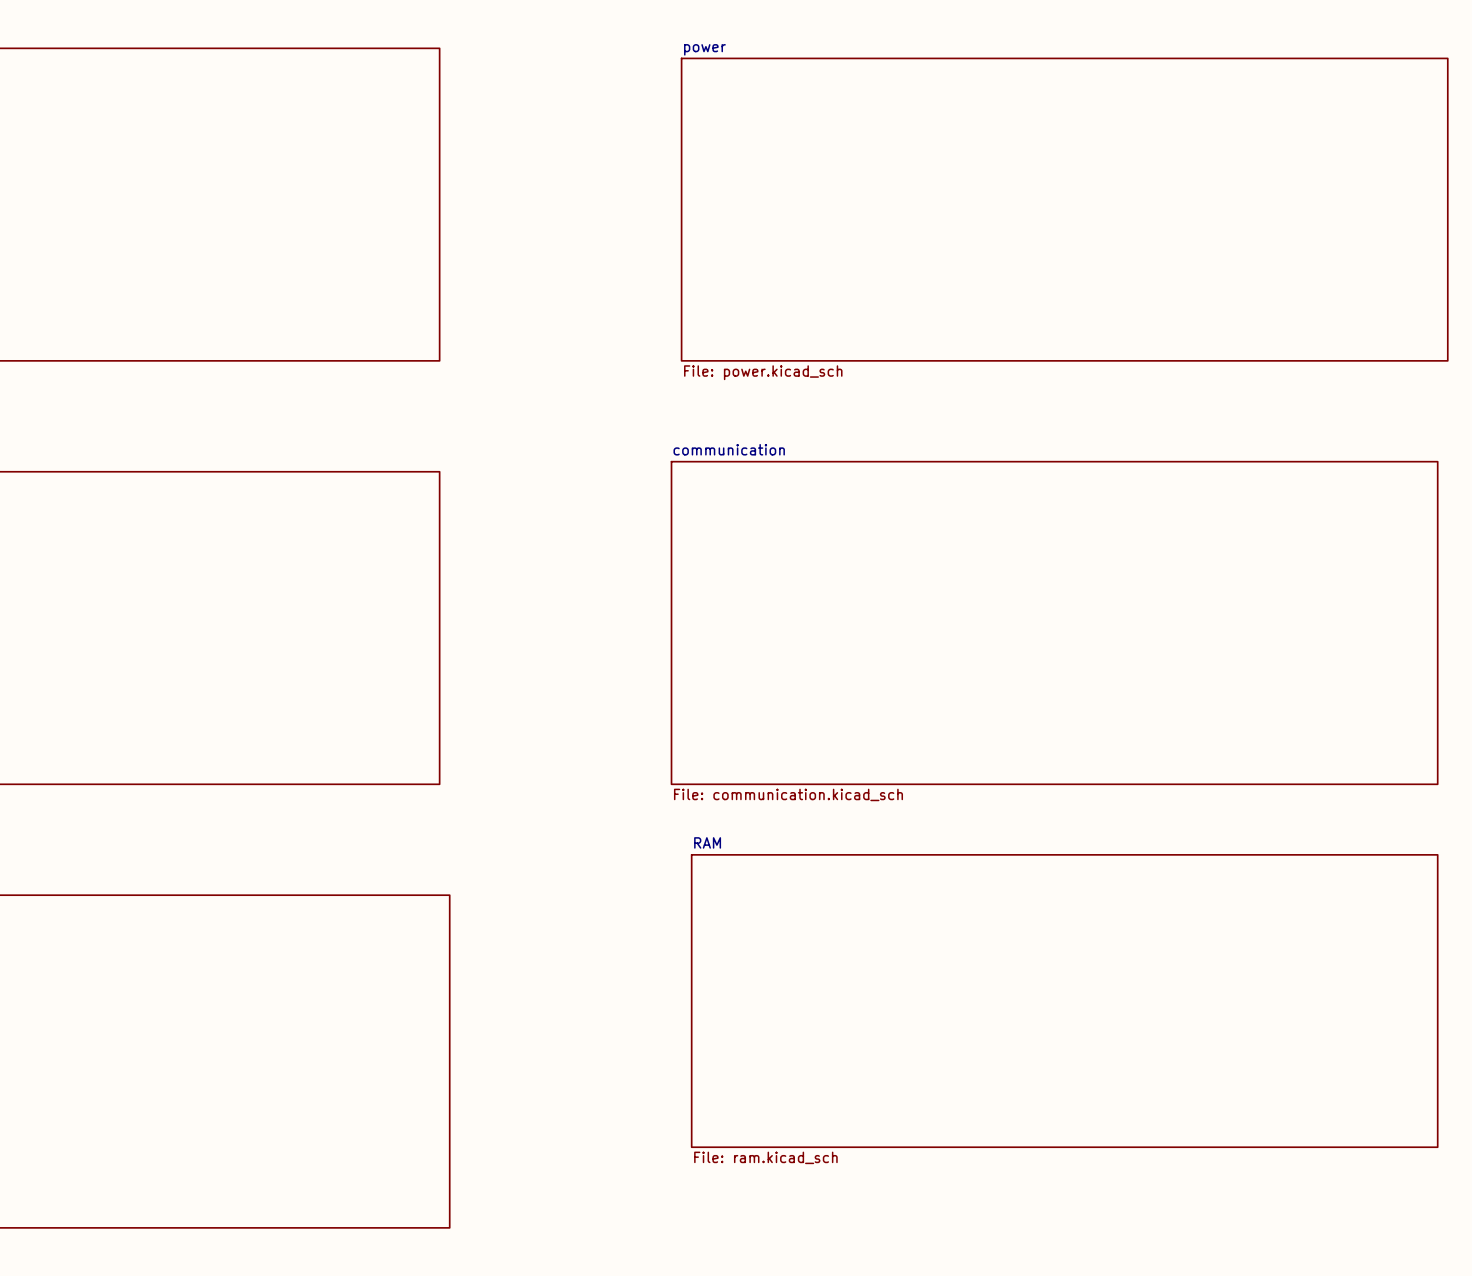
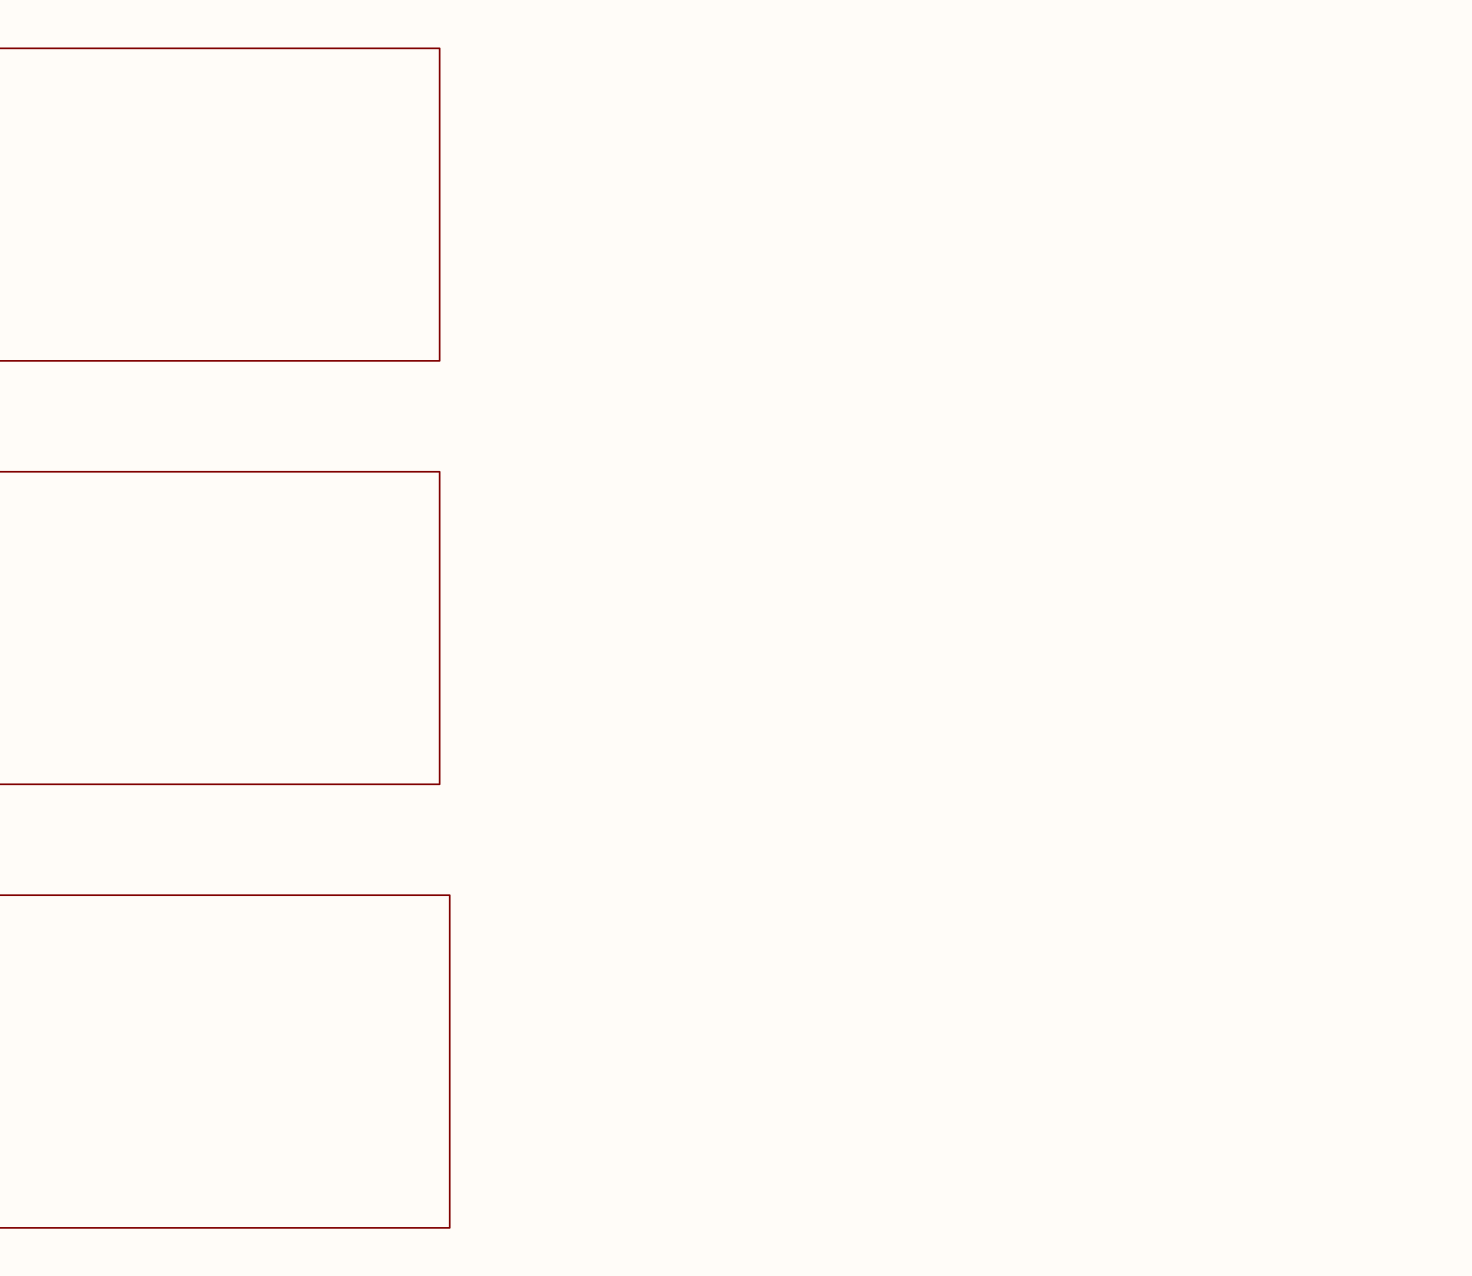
sheet power: File: power.kicad_sch (1064, 209) -> none
sheet communication: File: communication.kicad_sch (1054, 622) -> none
sheet RAM: File: ram.kicad_sch (1064, 1001) -> none

